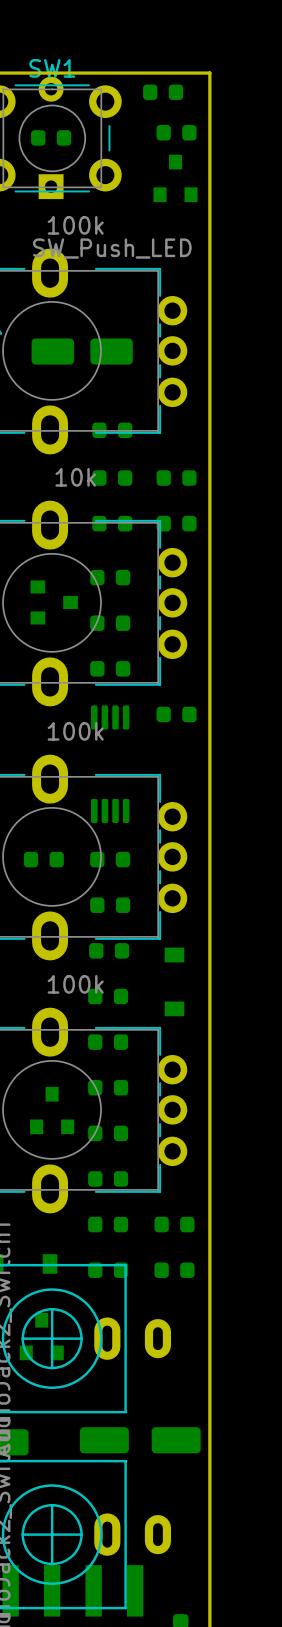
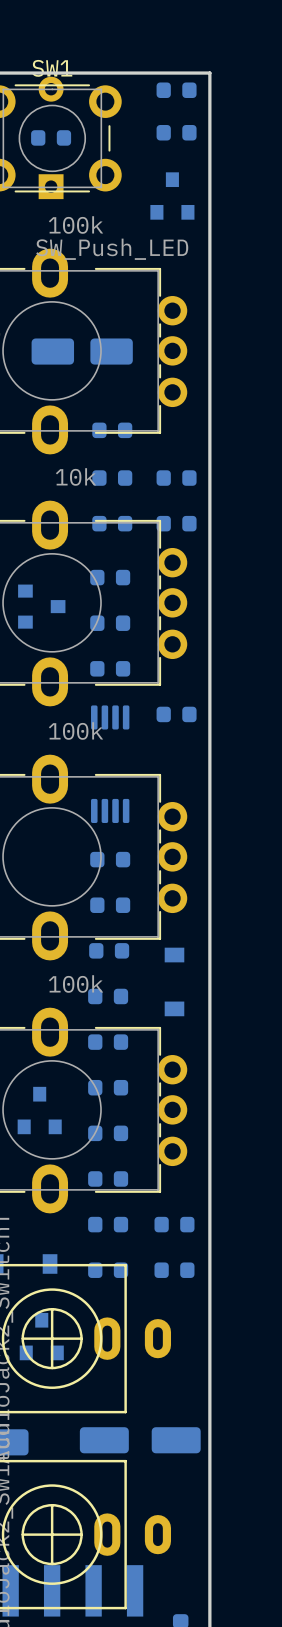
part position: (163, 92) -> (176, 90)
part position: (175, 178) -> (172, 196)
part position: (54, 602) -> (41, 606)
part: (43, 859) -> none
part position: (52, 1110) -> (39, 1110)

